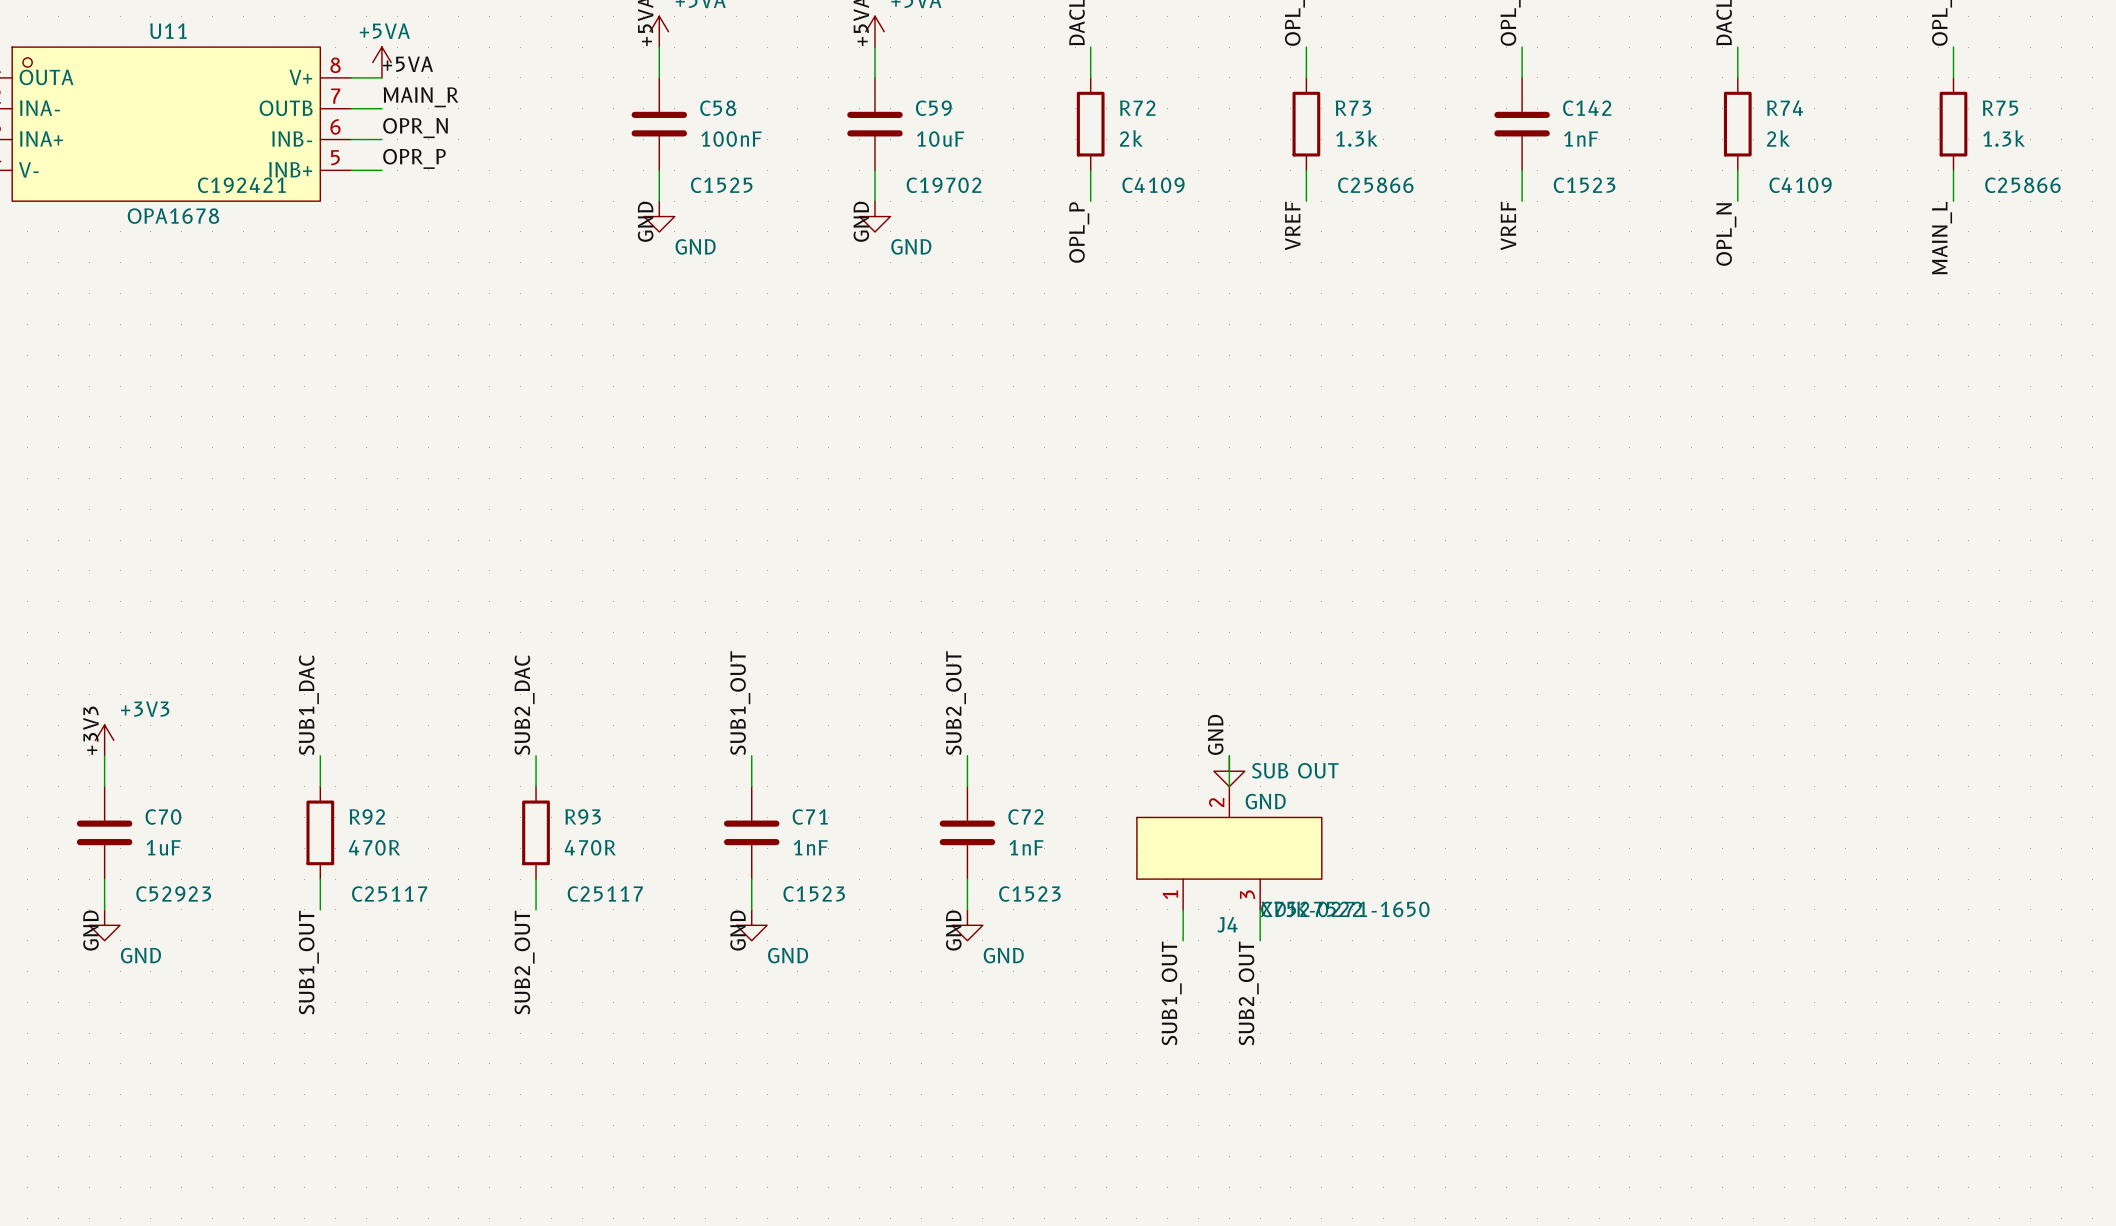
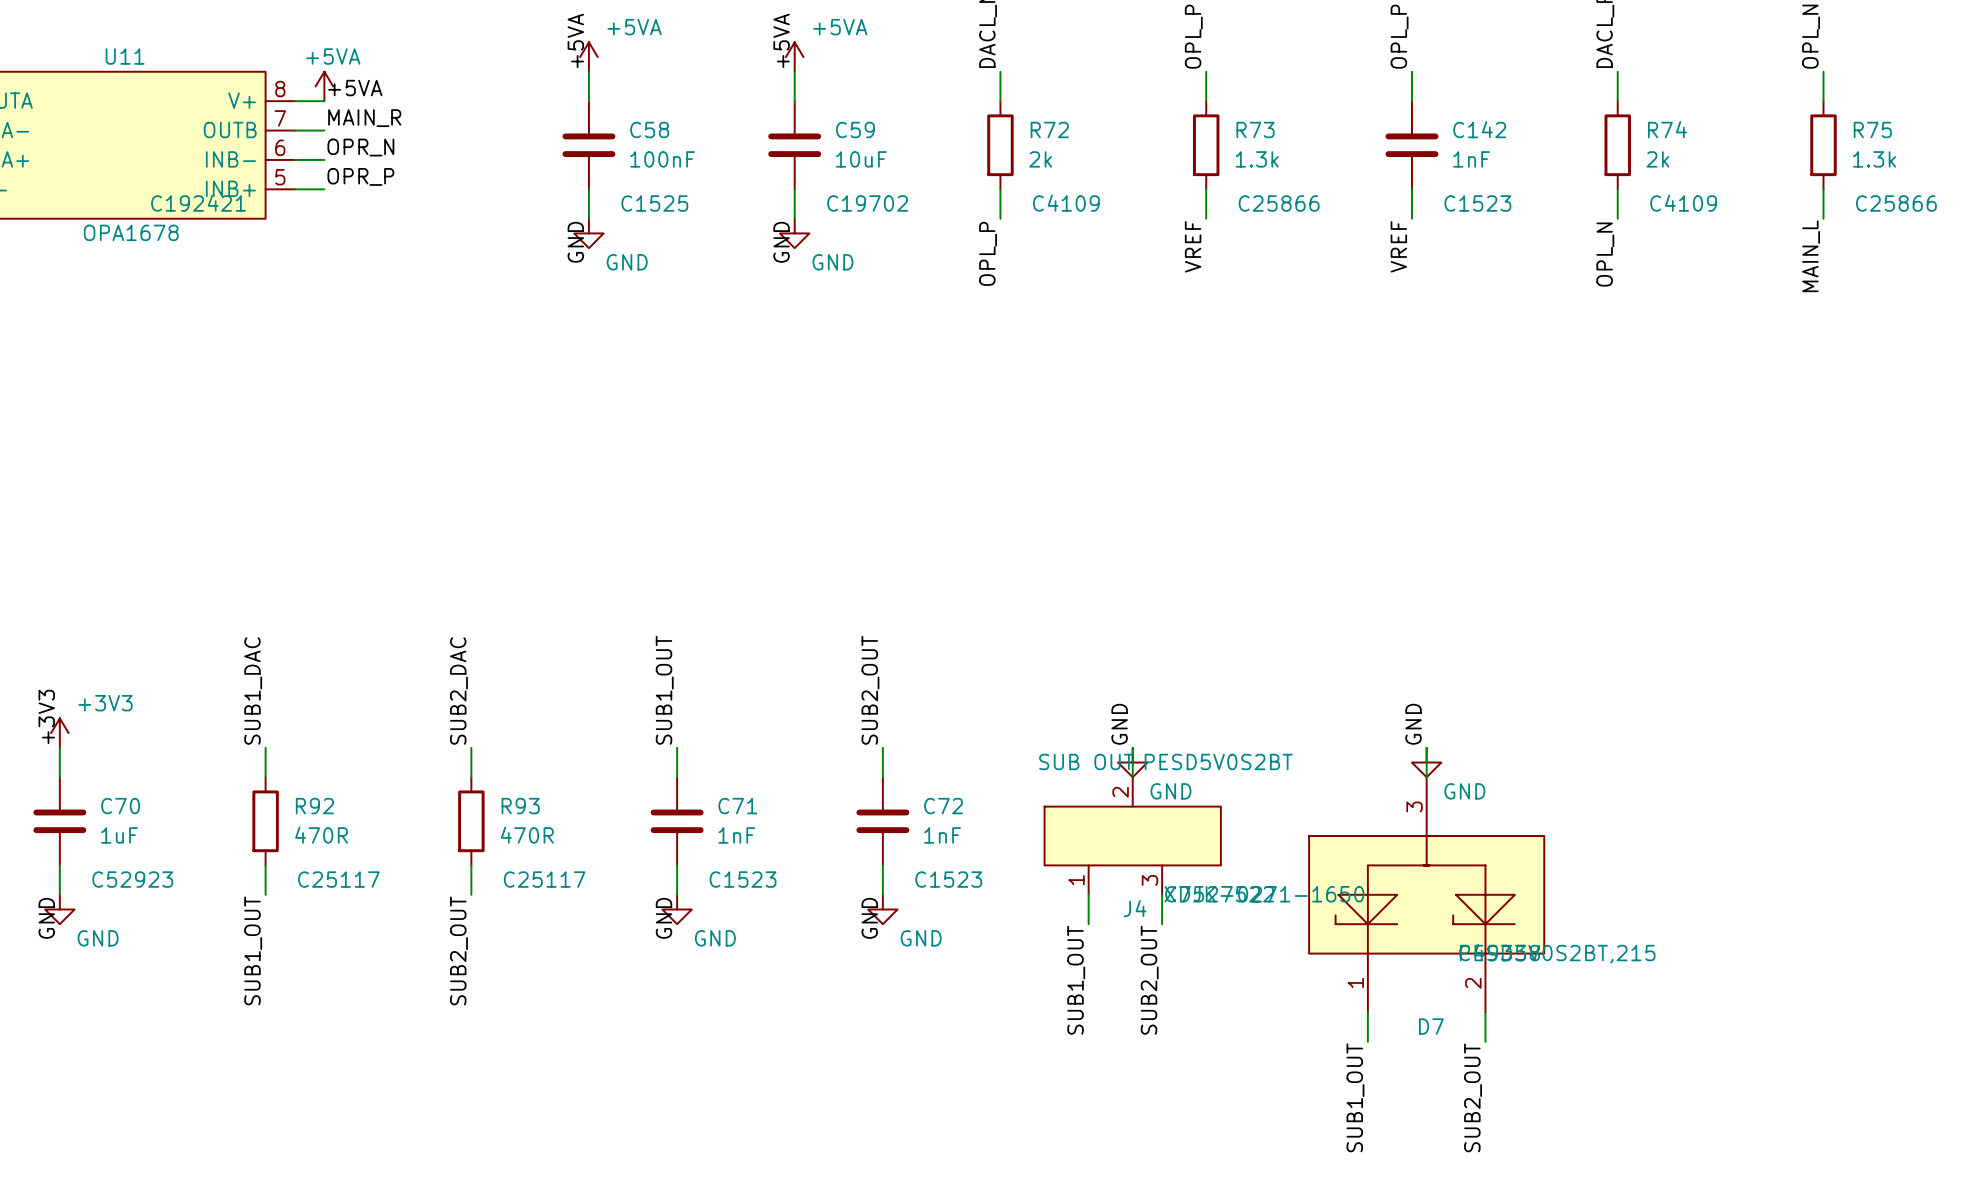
label: none -> GND (1413, 724)
wire: none -> (1426, 747) (1426, 777)
J4 value position: SUB OUT (1295, 770) -> SUB OUT (1086, 761)
power symbol: none -> GND (1426, 762)
D7: none -> PESD5V0S2BT (1426, 894)
wire: none -> (1367, 1012) (1367, 1041)
wire: none -> (1485, 1012) (1485, 1041)
label: none -> SUB1_OUT (1355, 1097)
label: none -> SUB2_OUT (1473, 1097)

